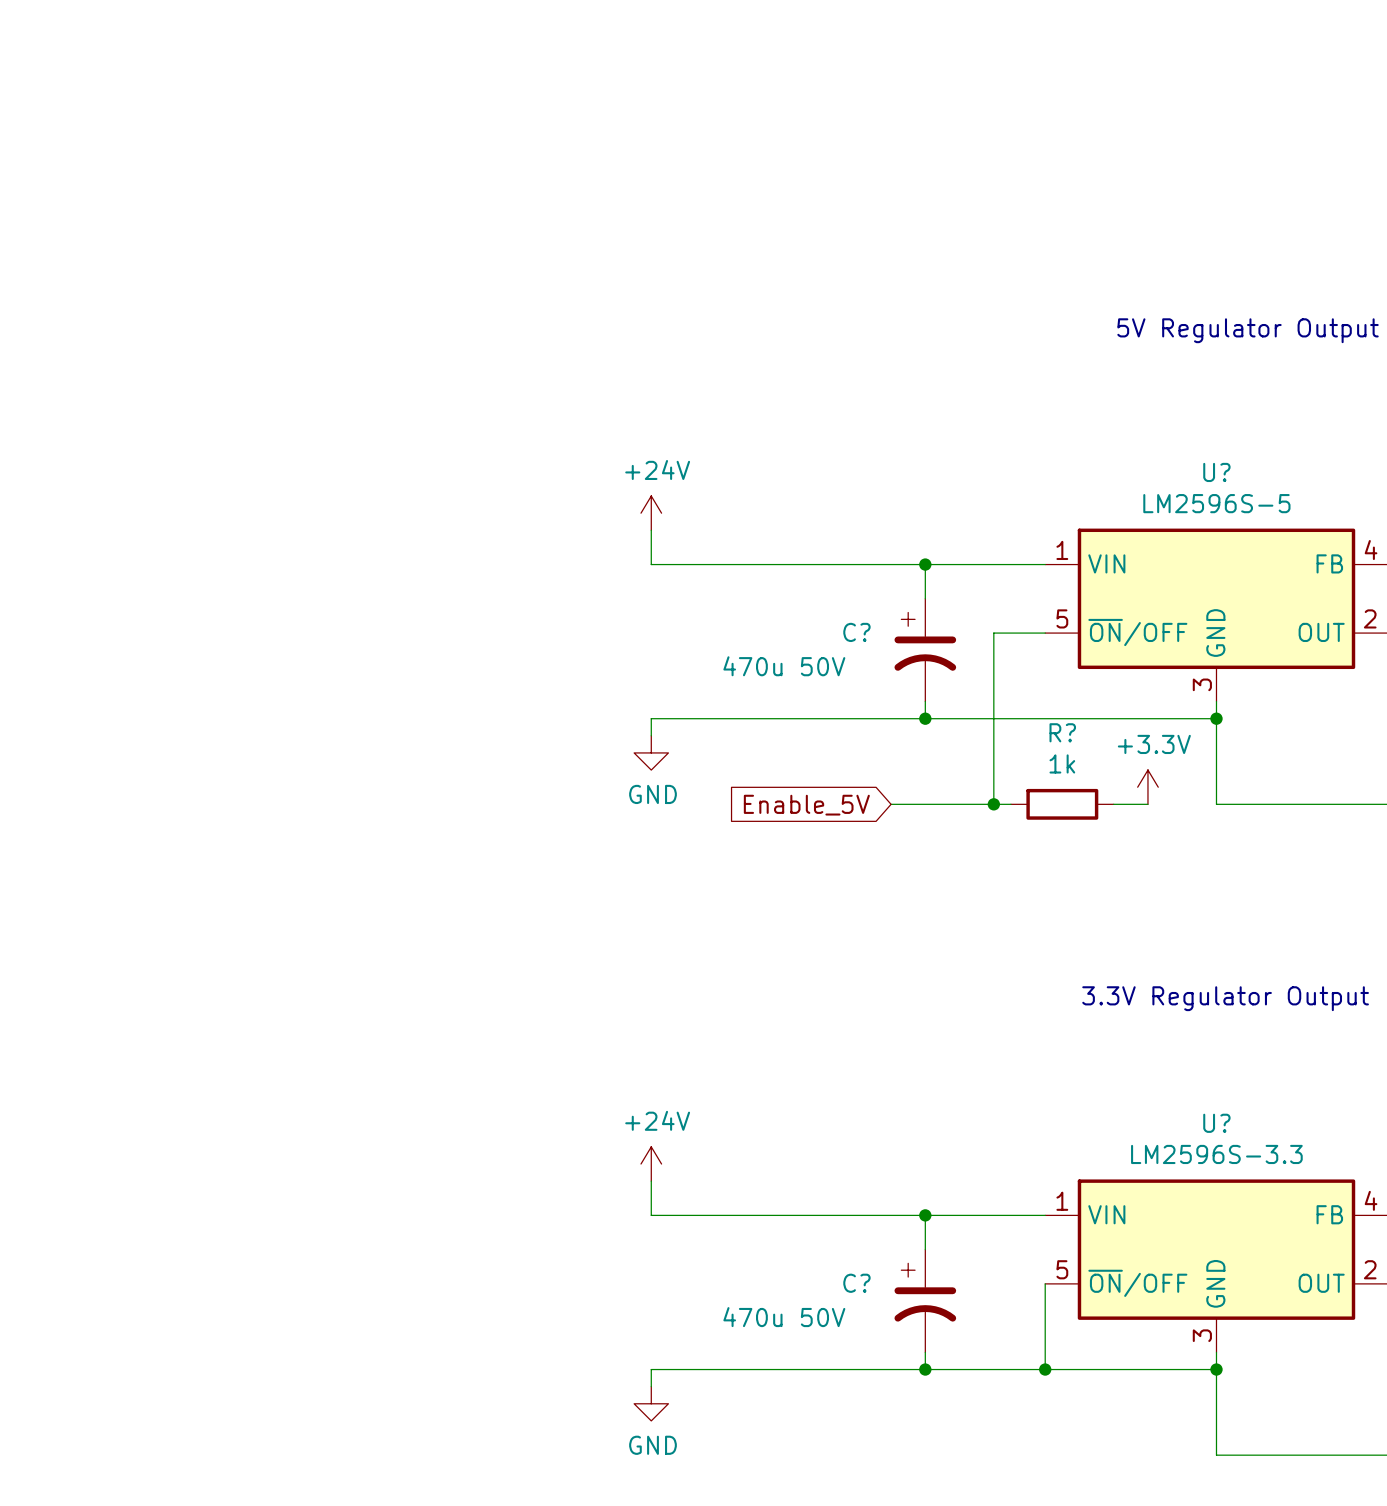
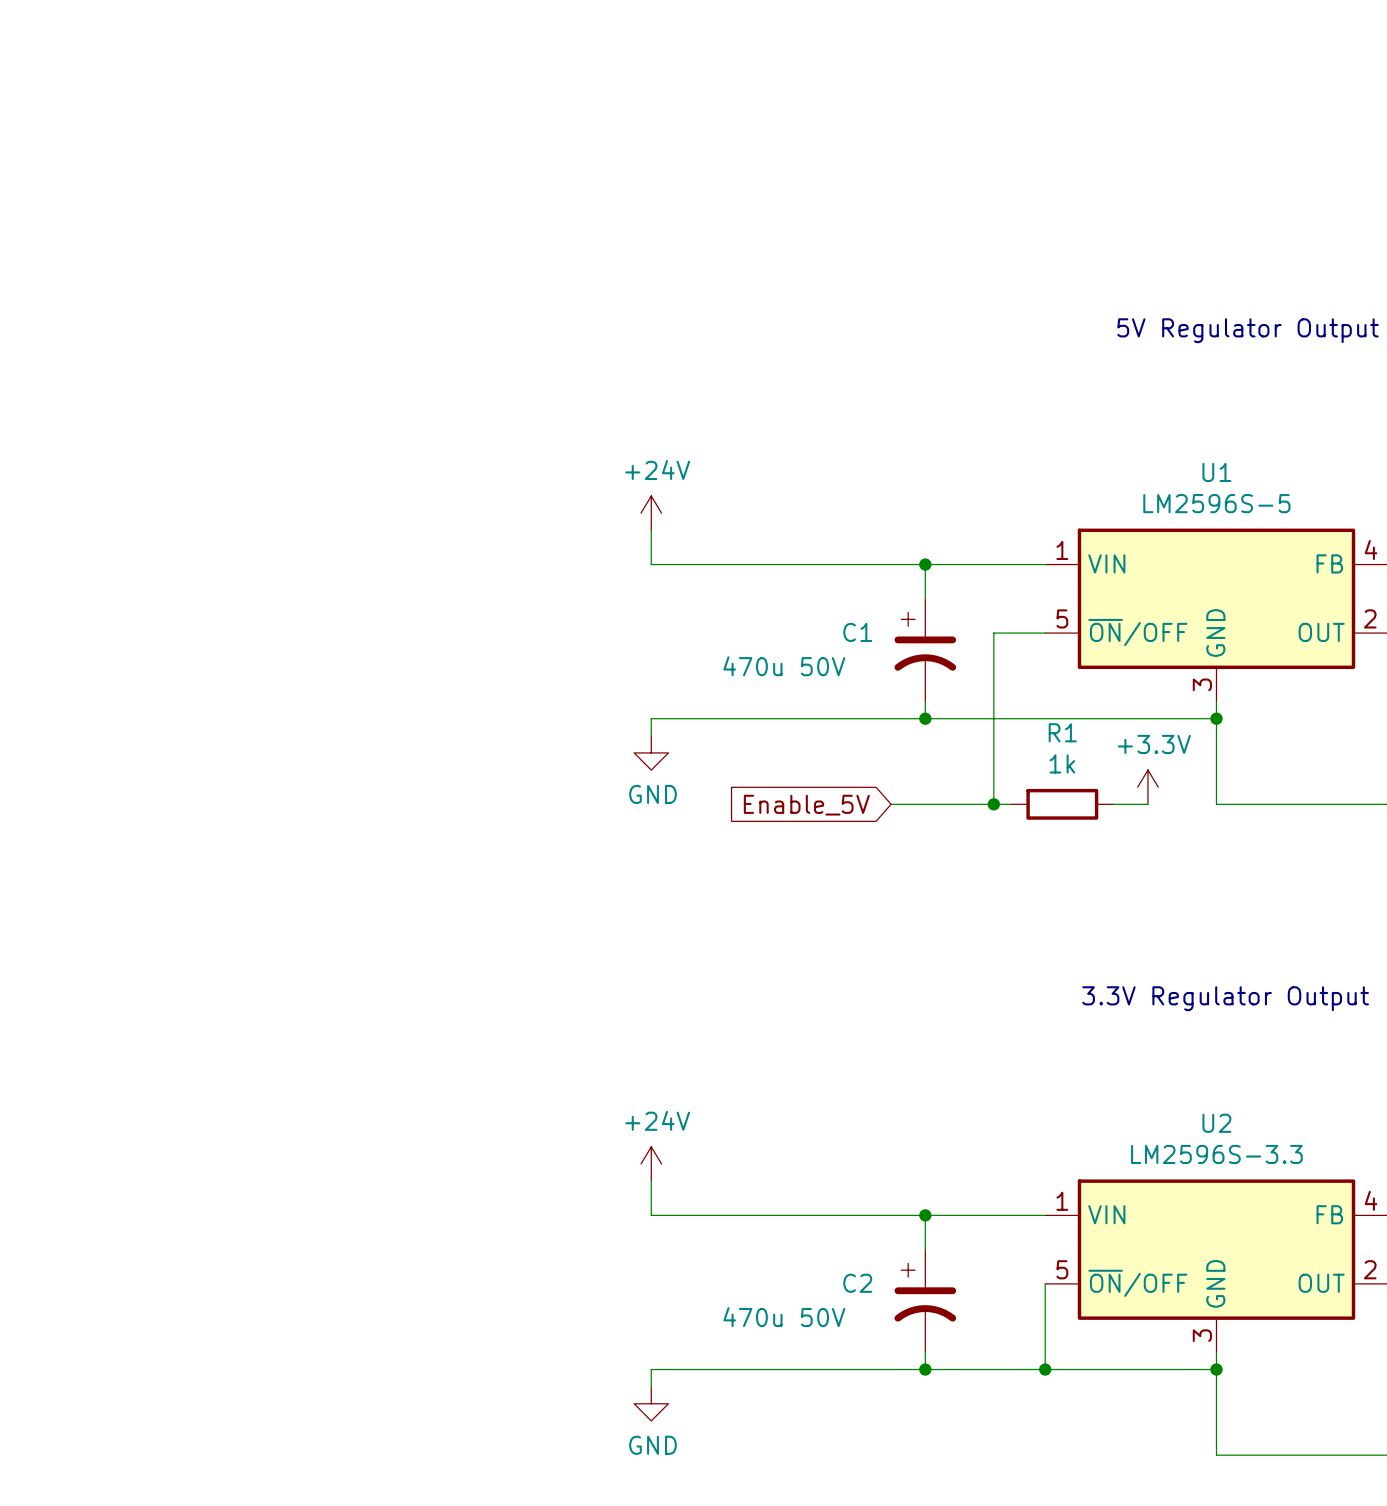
U? name: U? (1216, 472) -> U1 (1216, 472)
C? name: C? (856, 632) -> C1 (857, 632)
R? name: R? (1062, 732) -> R1 (1062, 732)
U? name: U? (1216, 1123) -> U2 (1216, 1123)
C? name: C? (856, 1283) -> C2 (857, 1283)

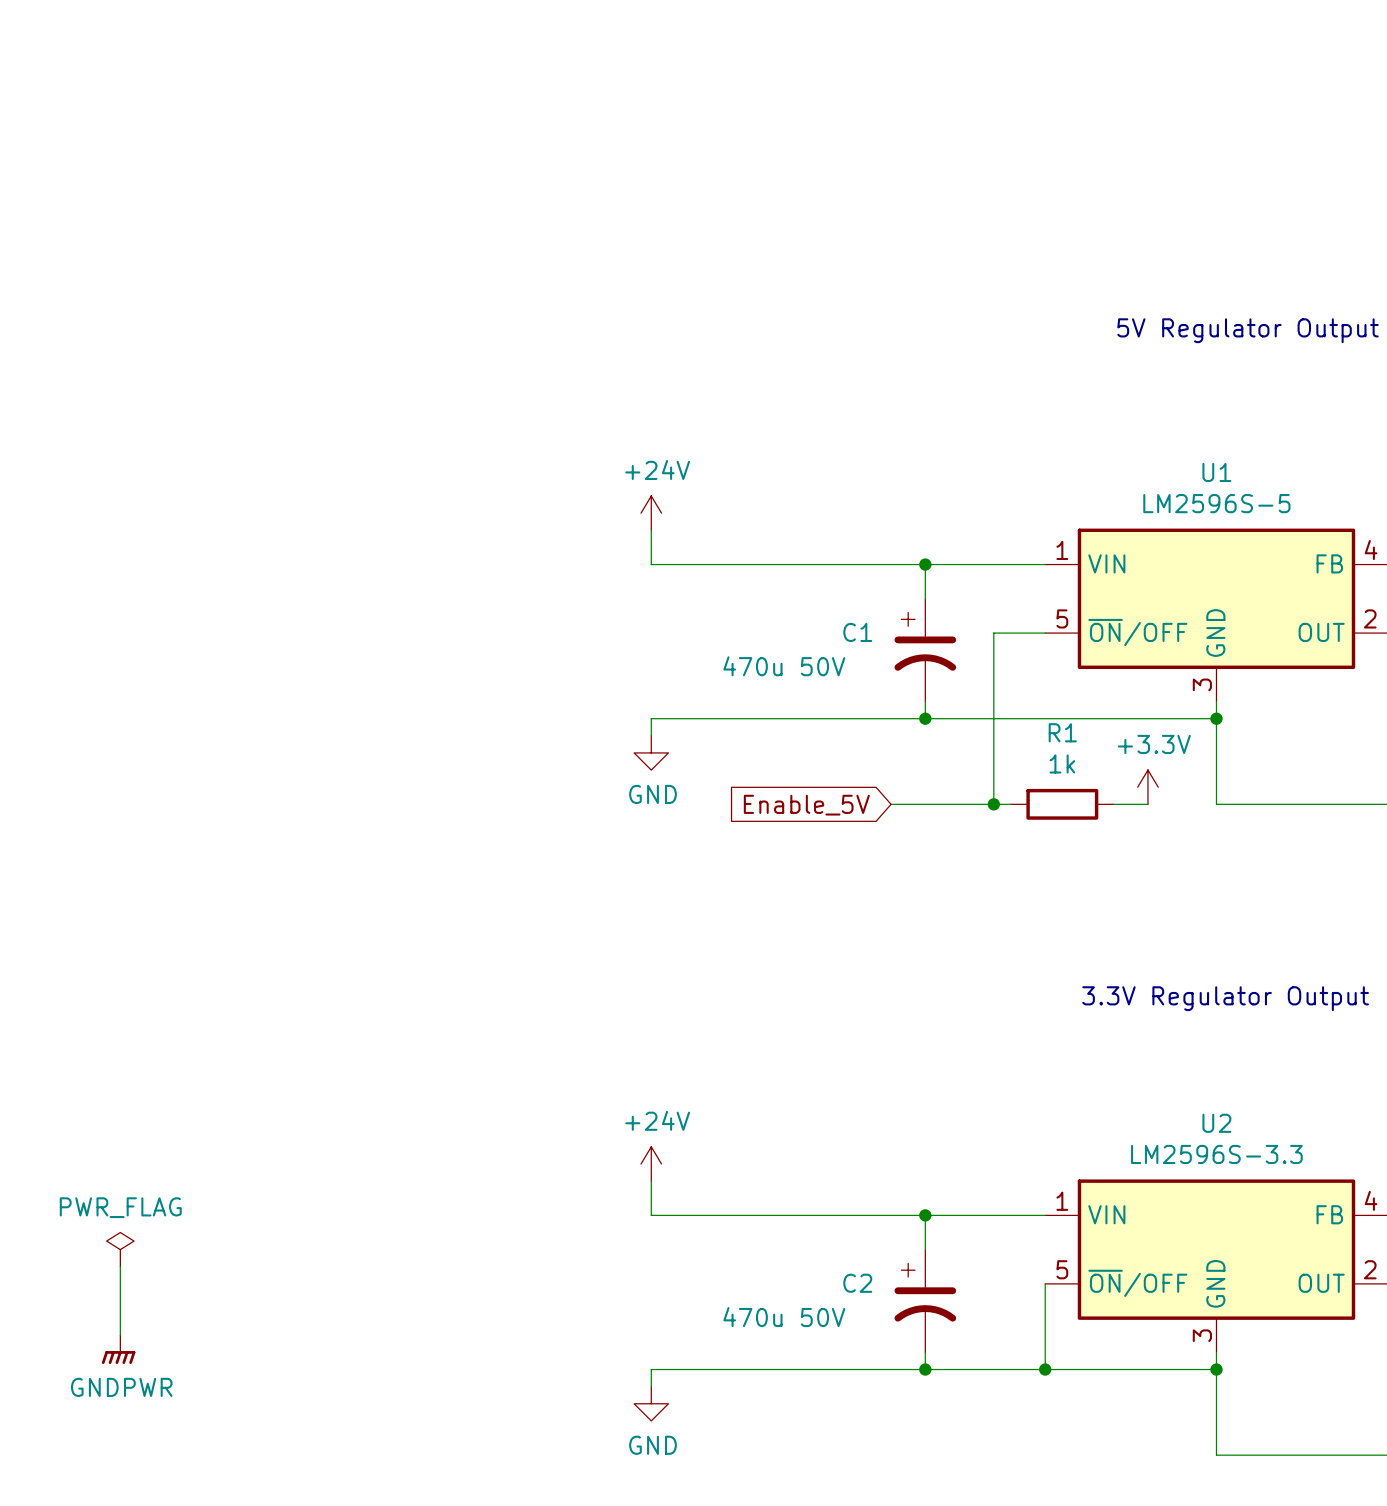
power symbol: none -> PWR_FLAG (120, 1249)
wire: none -> (120, 1266) (120, 1335)
power symbol: none -> GNDPWR (118, 1349)

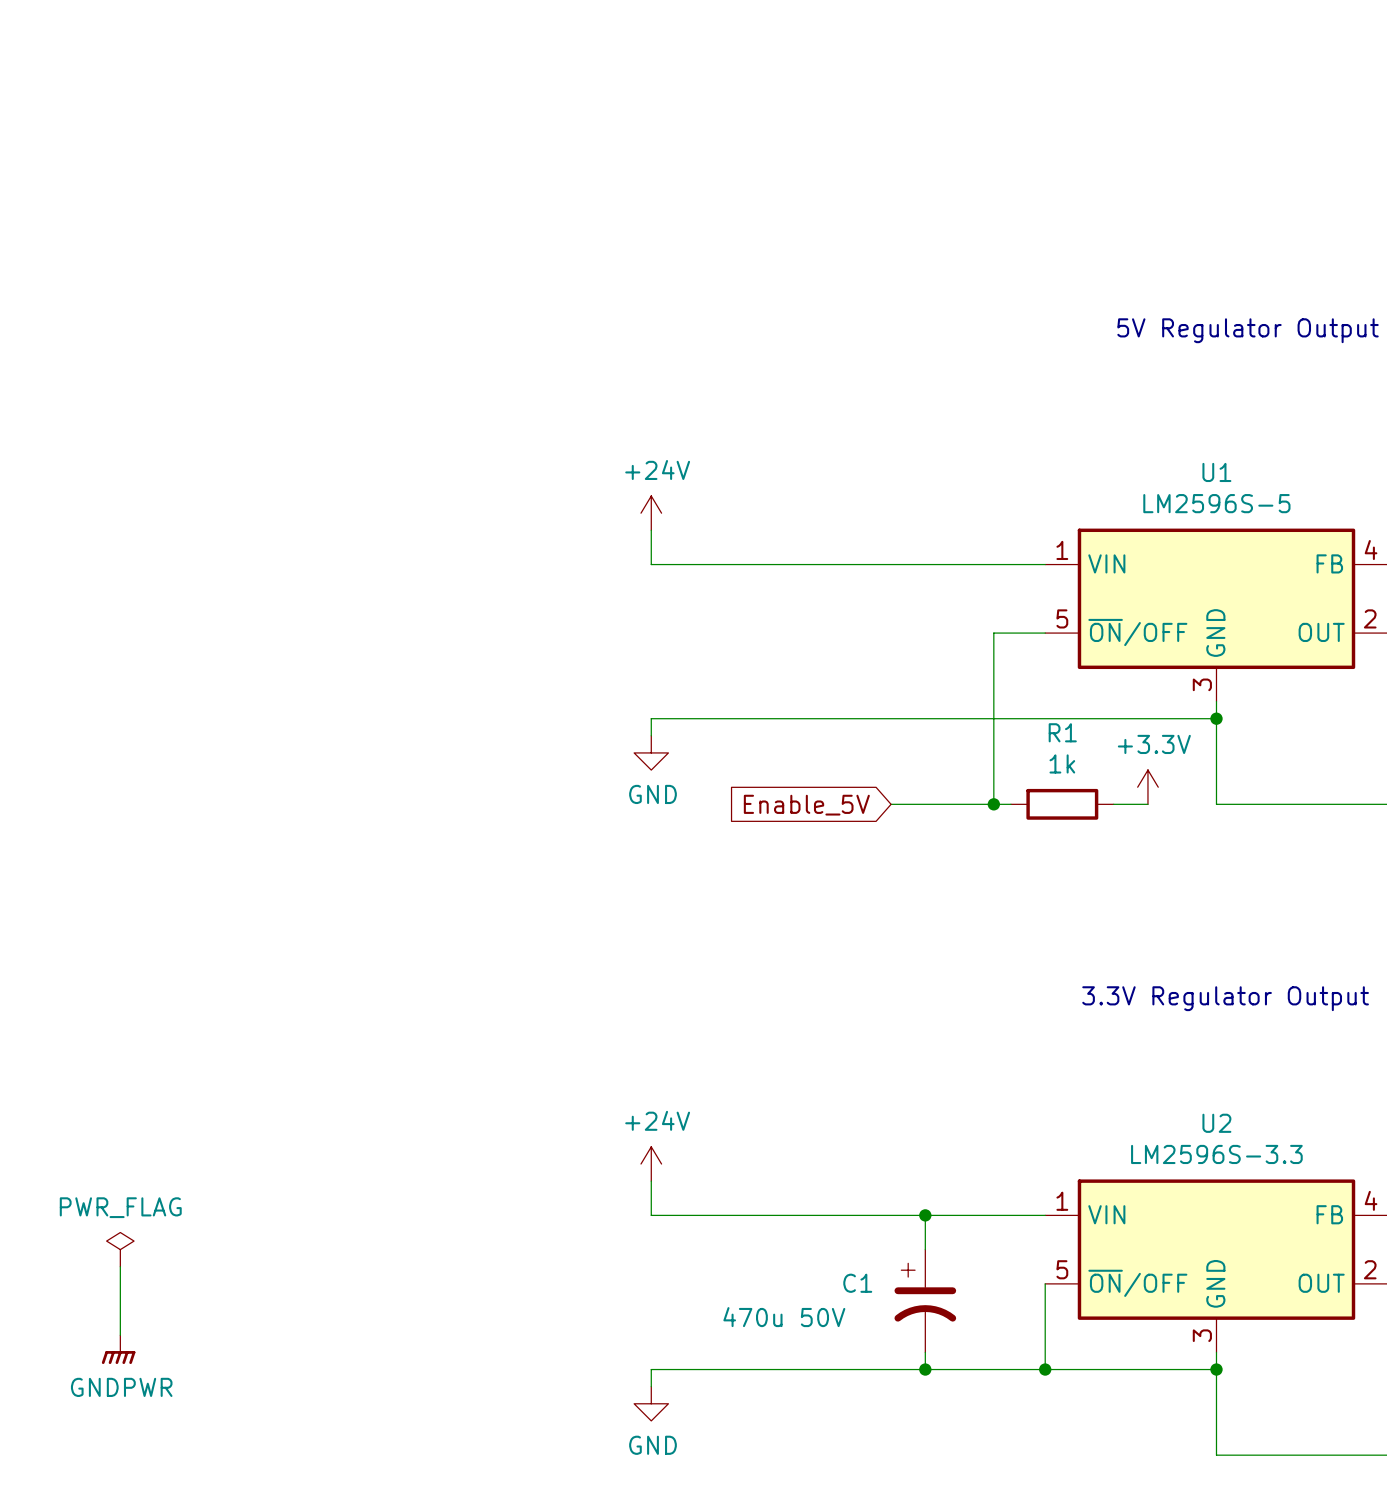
wire: (925, 564) (925, 598) -> none
junction: (925, 564) -> none
C1: 470u 50V (925, 650) -> none
wire: (925, 701) (925, 718) -> none
junction: (925, 718) -> none
C2 name: C2 (857, 1283) -> C1 (857, 1283)

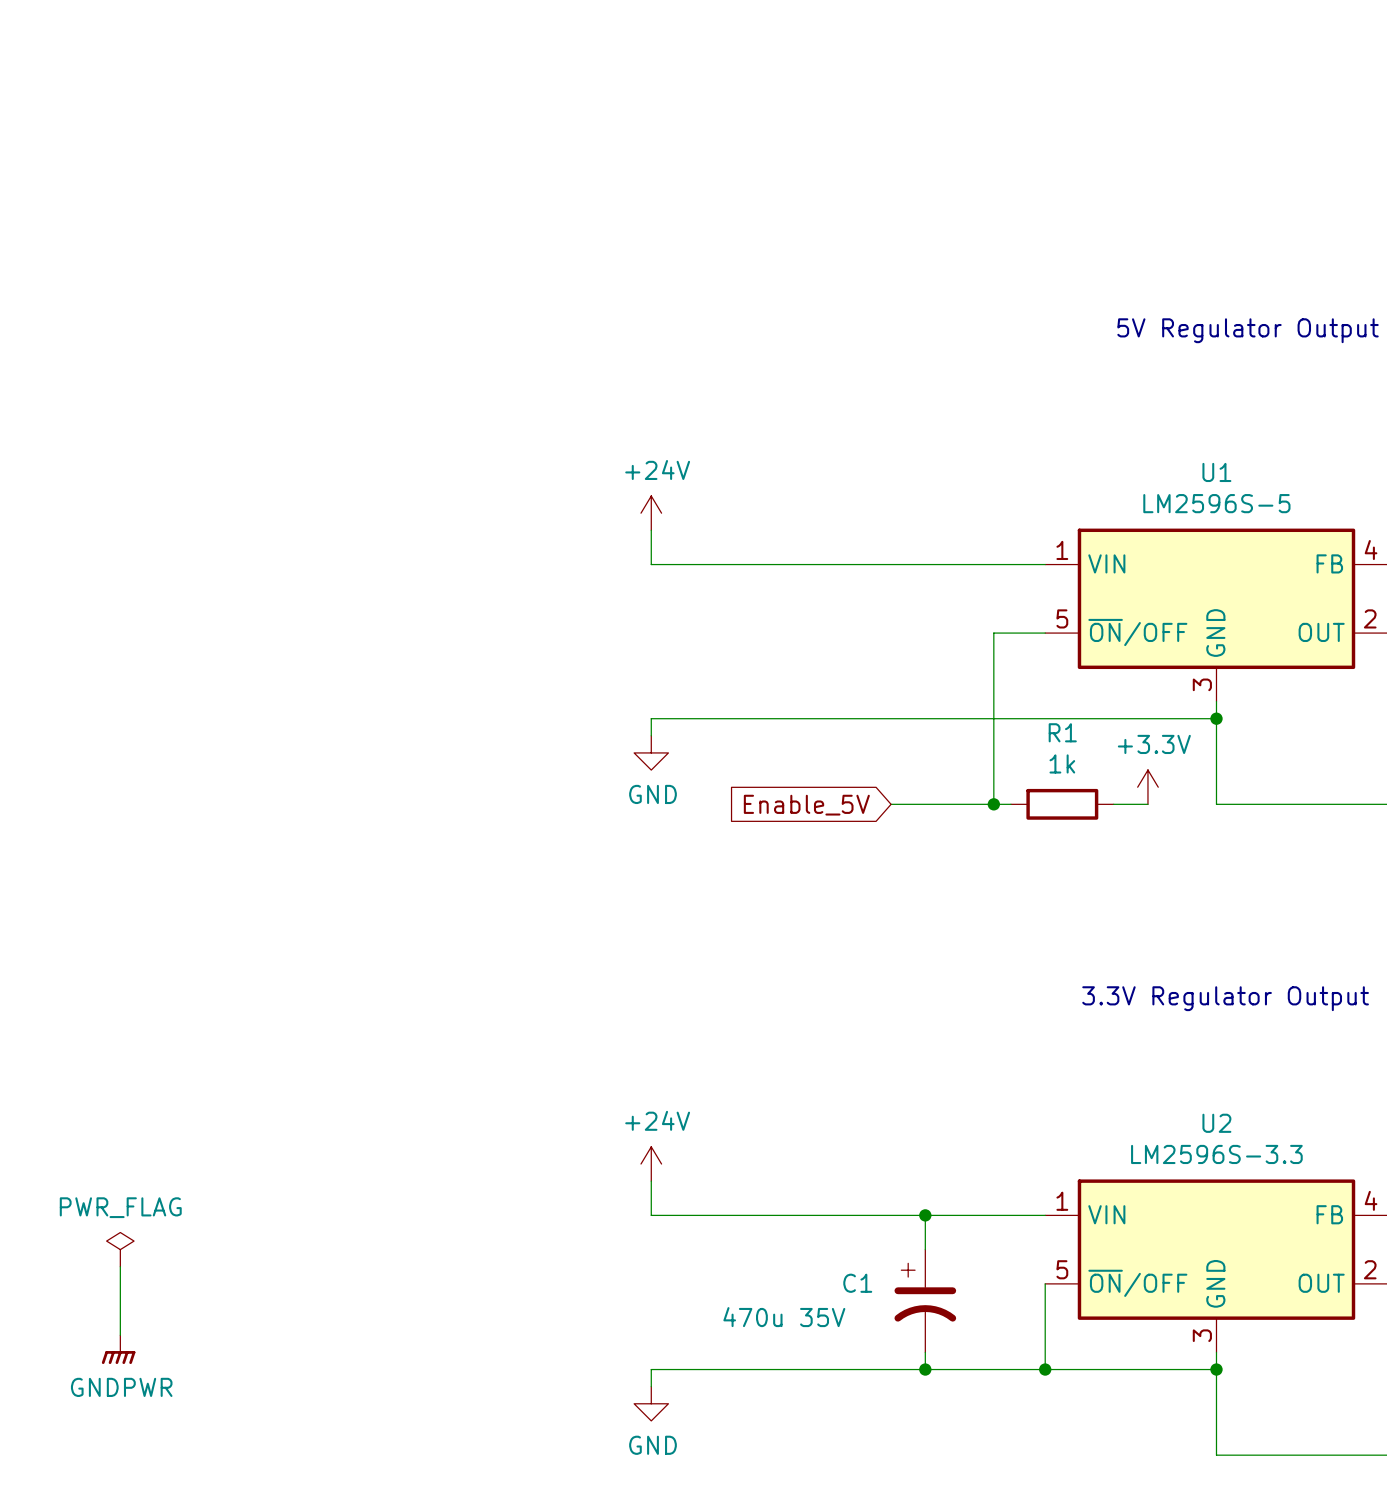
C1 value: 470u 50V (784, 1317) -> 470u 35V (784, 1317)

